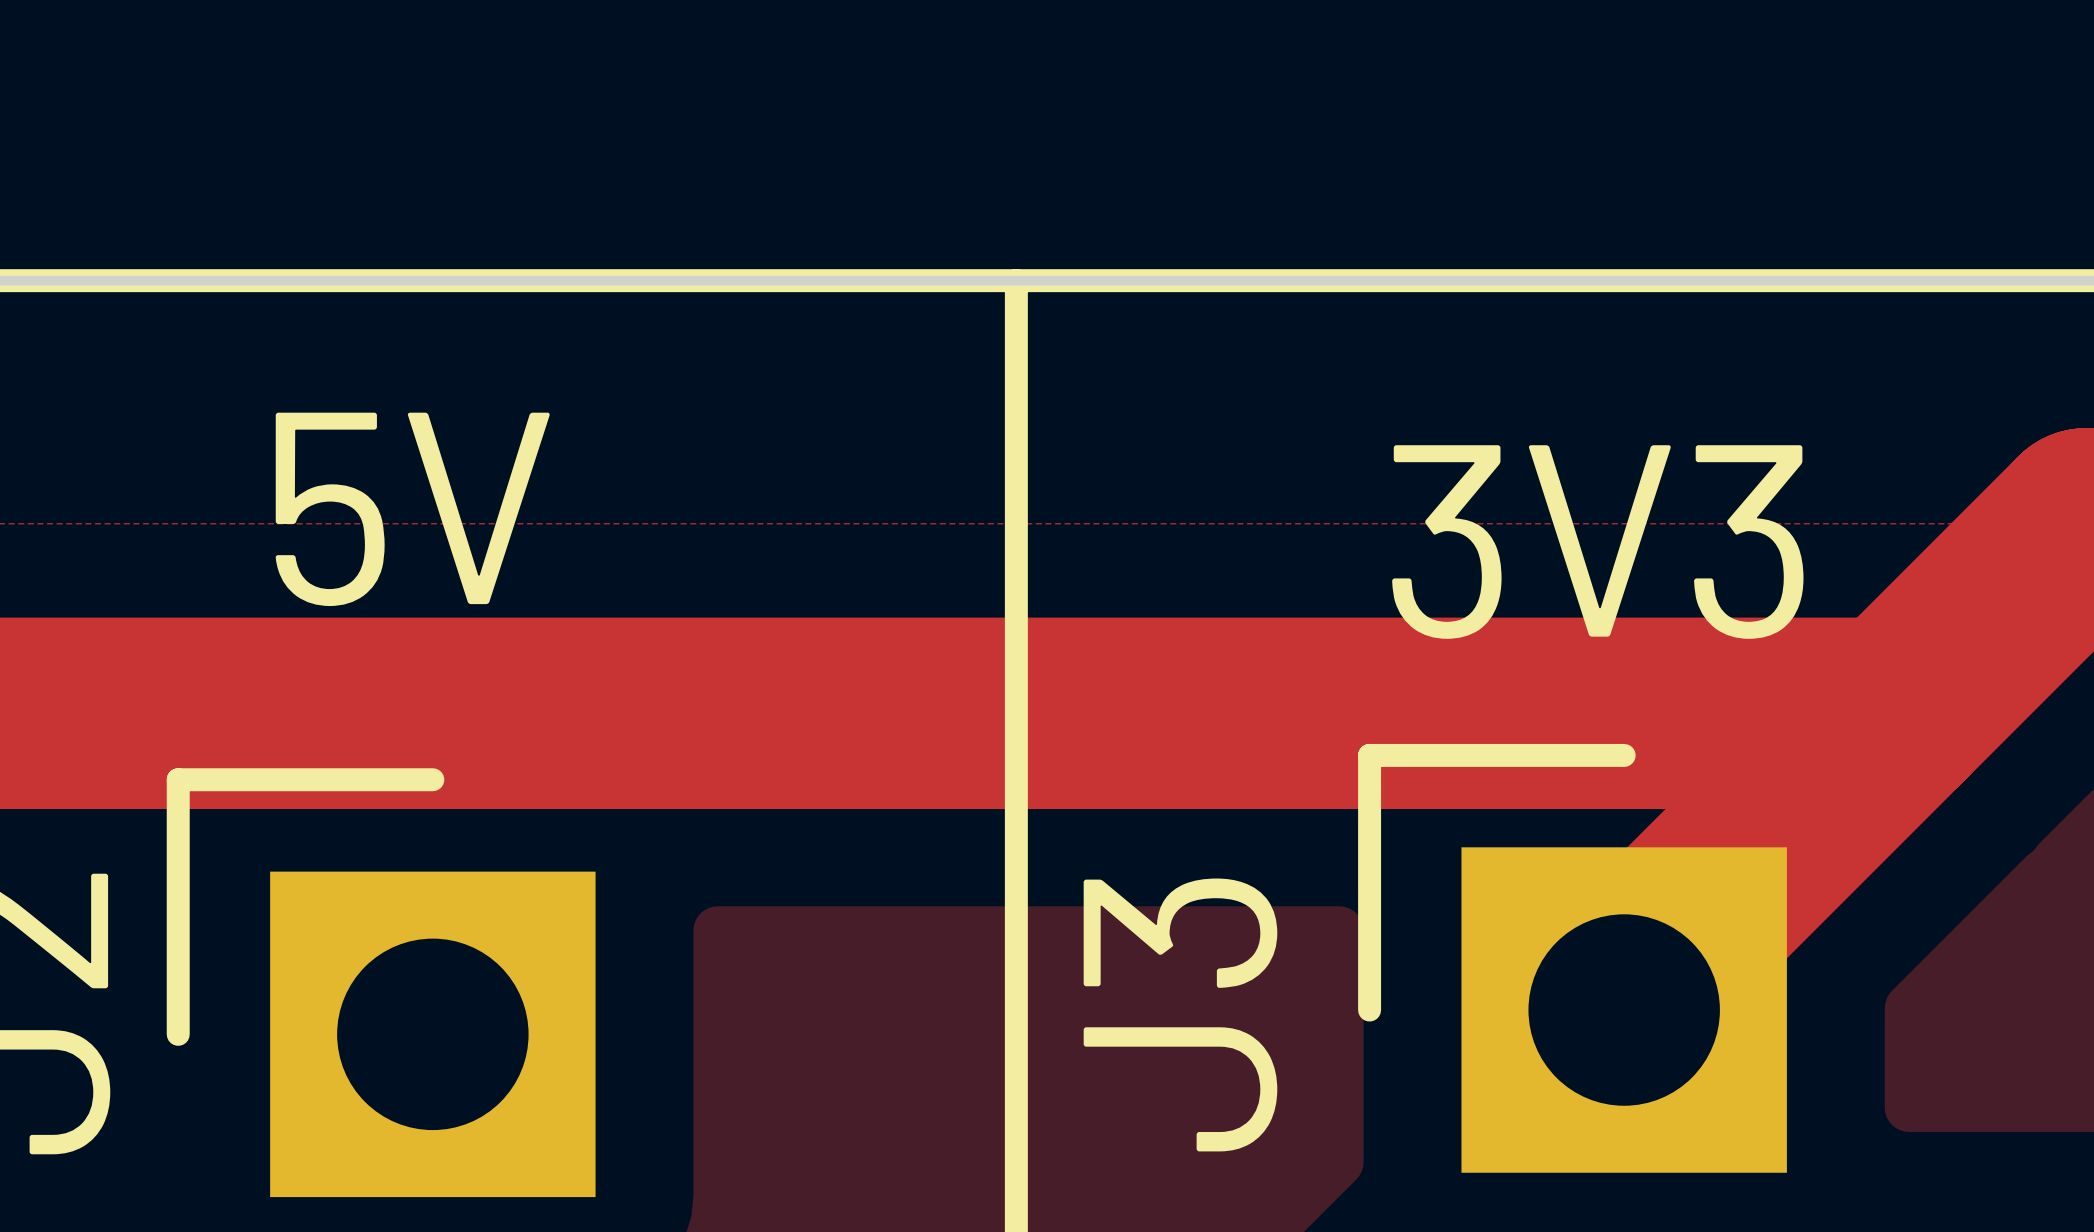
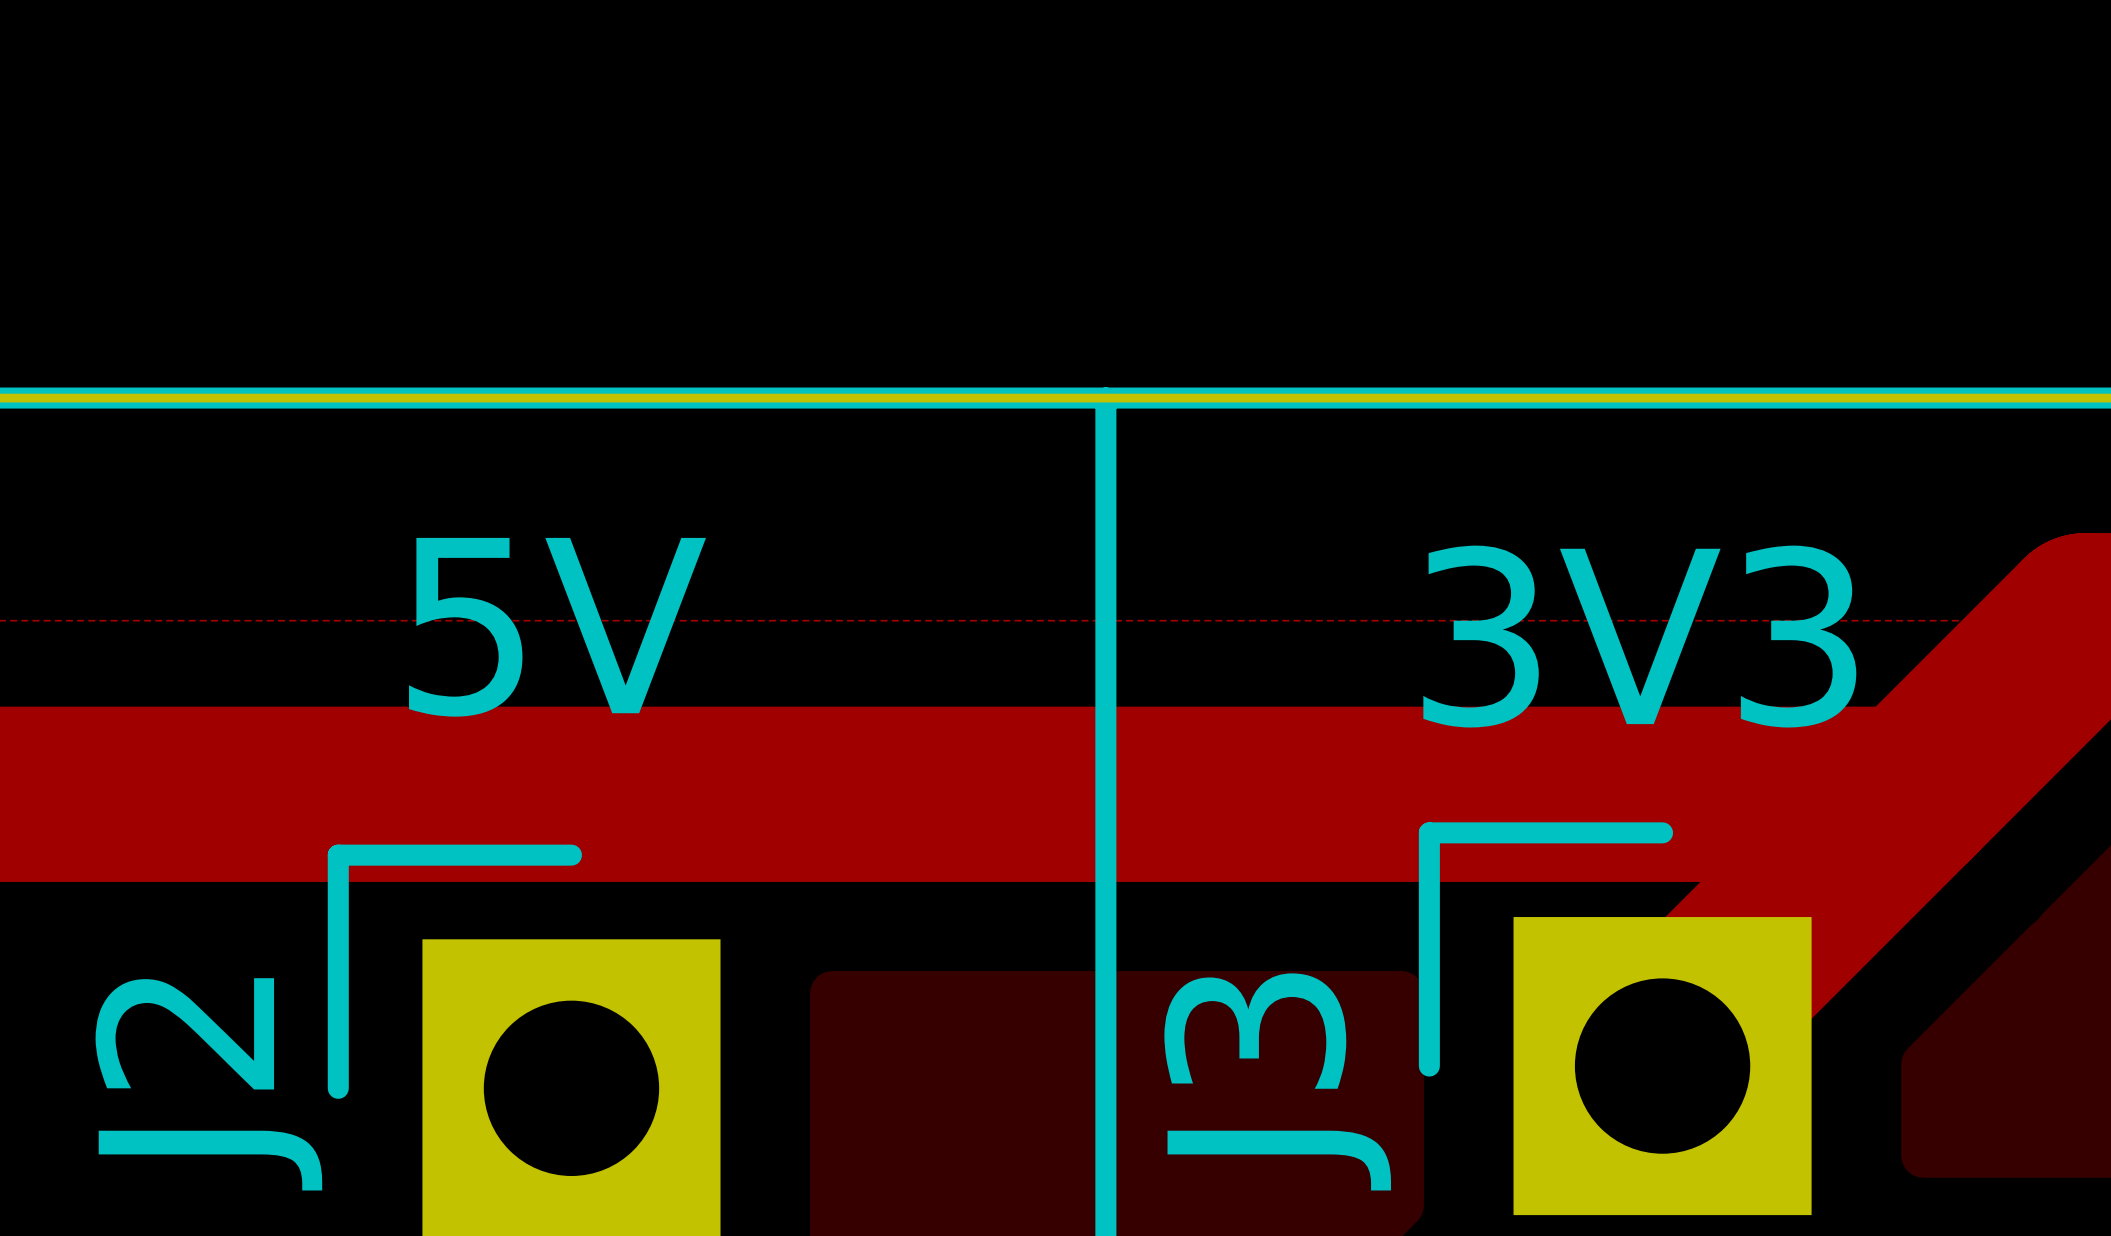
text position: 5V (413, 509) -> 5V (557, 627)

